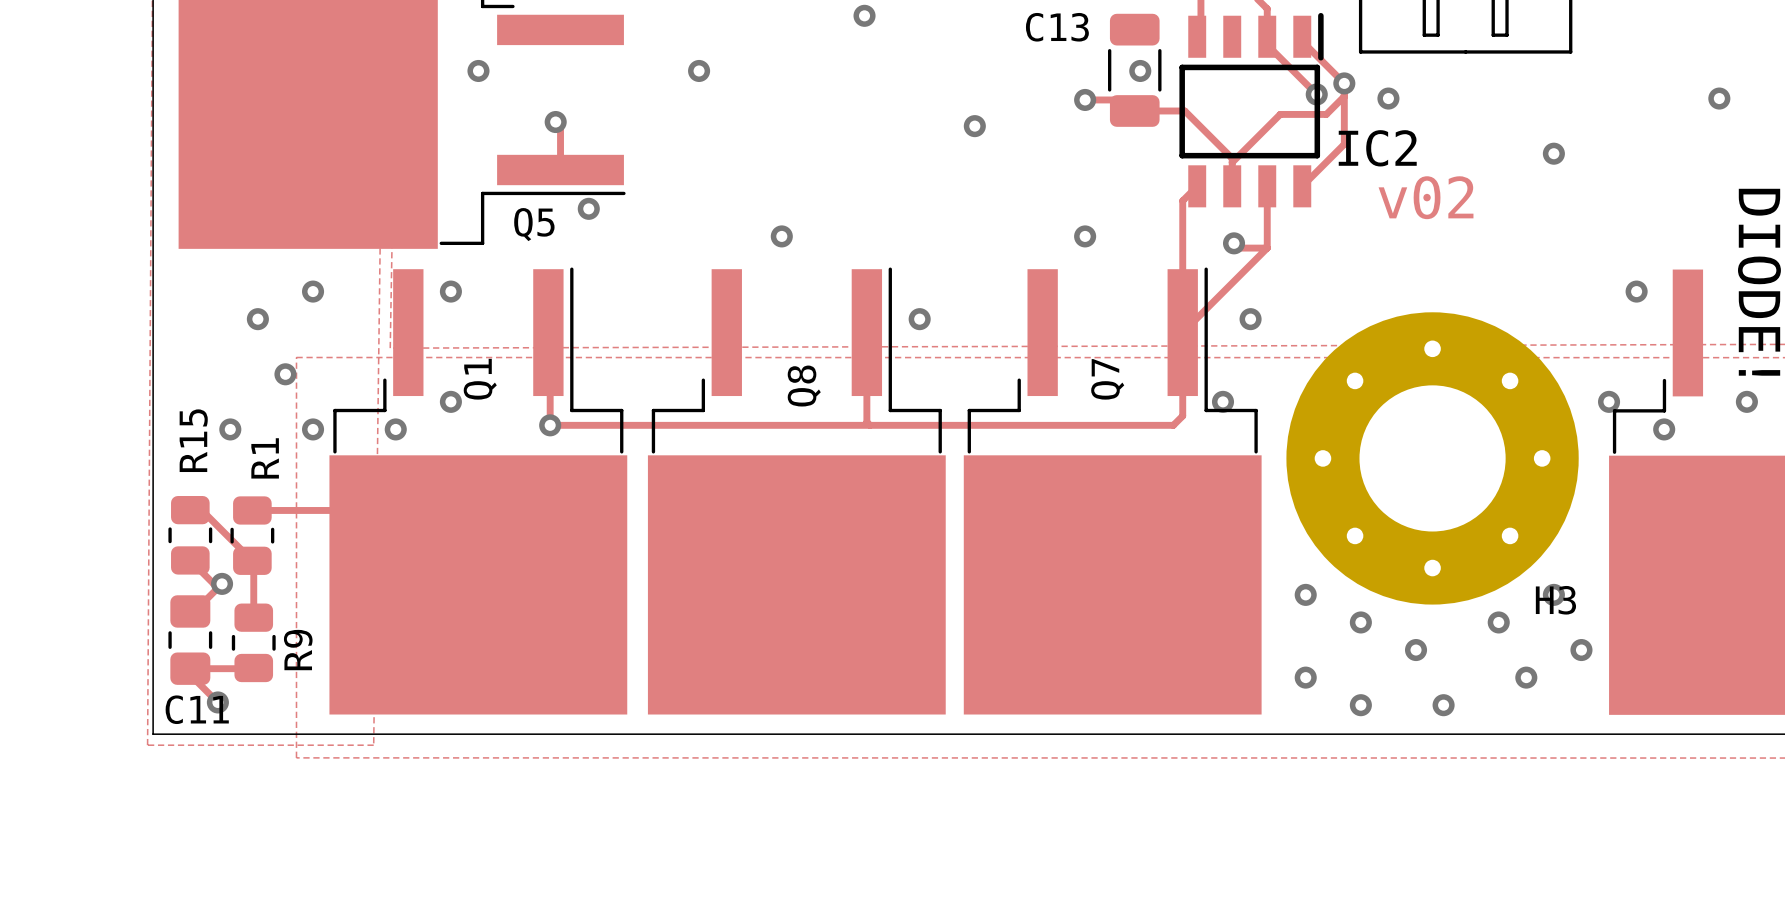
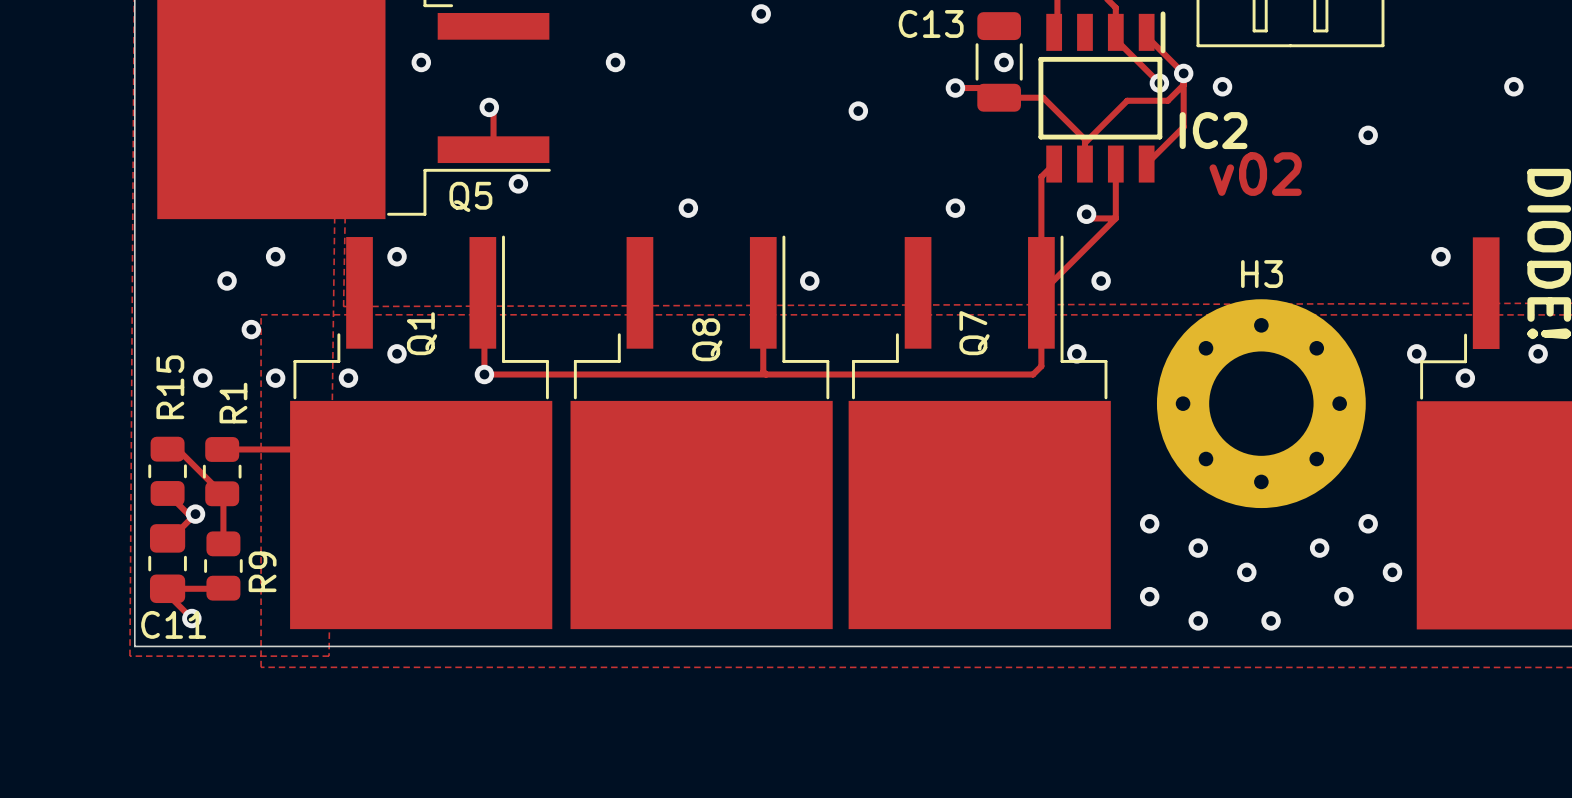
H3 footprint: [1286, 312, 1579, 605] -> [1156, 299, 1366, 509]
H3 name position: H3 (1555, 600) -> H3 (1261, 274)

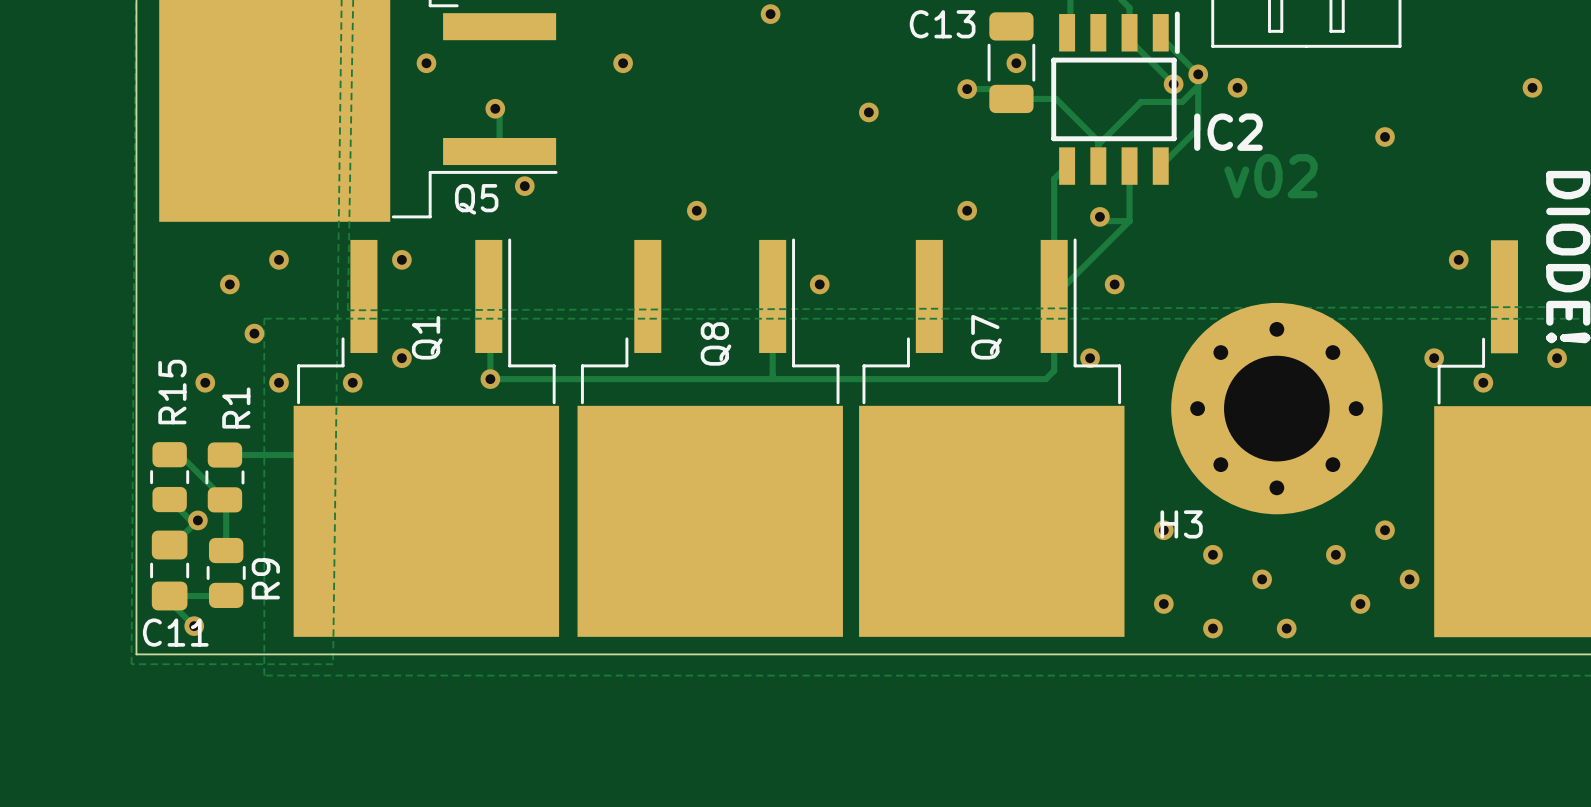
H3 name position: H3 (1261, 274) -> H3 (1181, 524)

